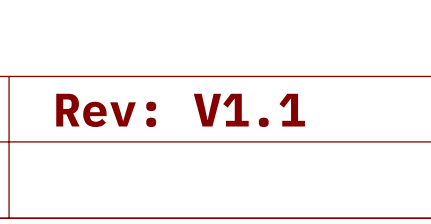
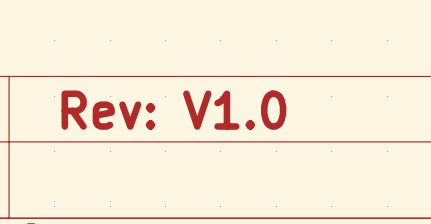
title block: Rev: V1.1 (180, 110) -> Rev: V1.0 (173, 110)

